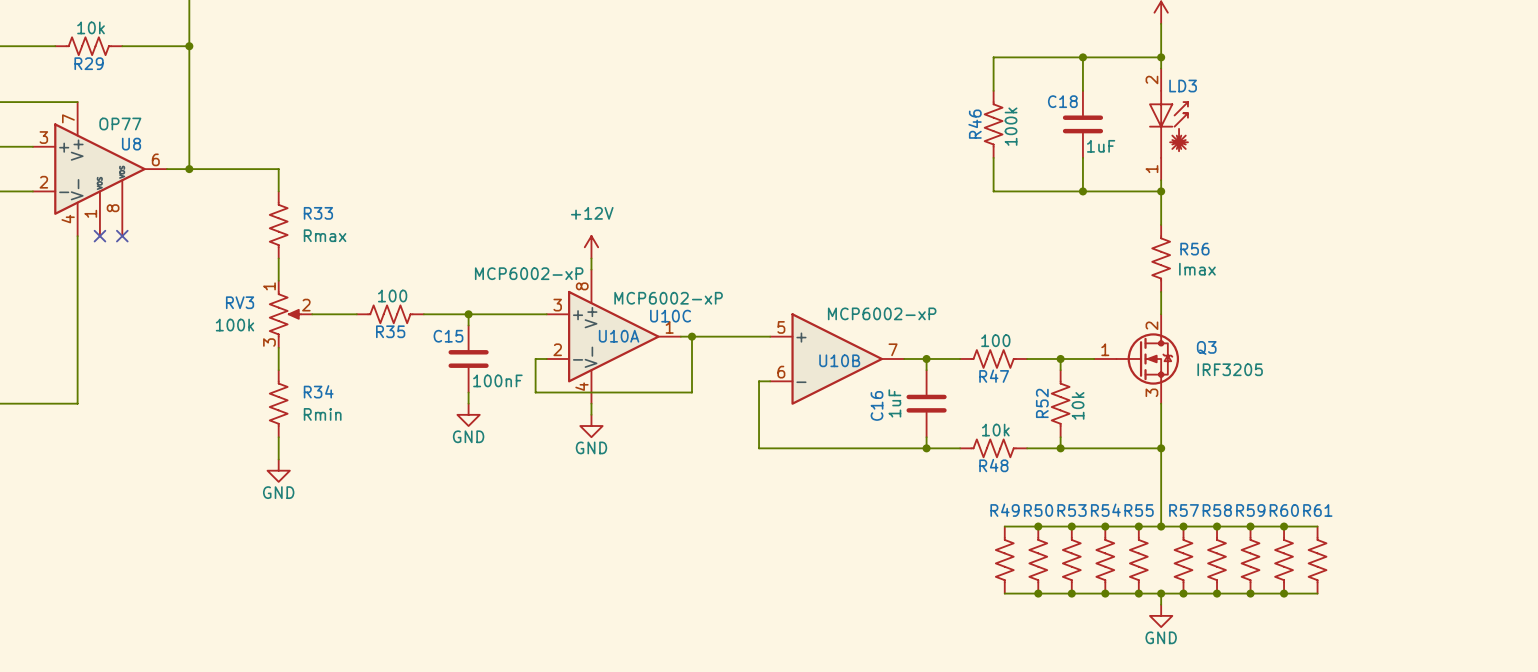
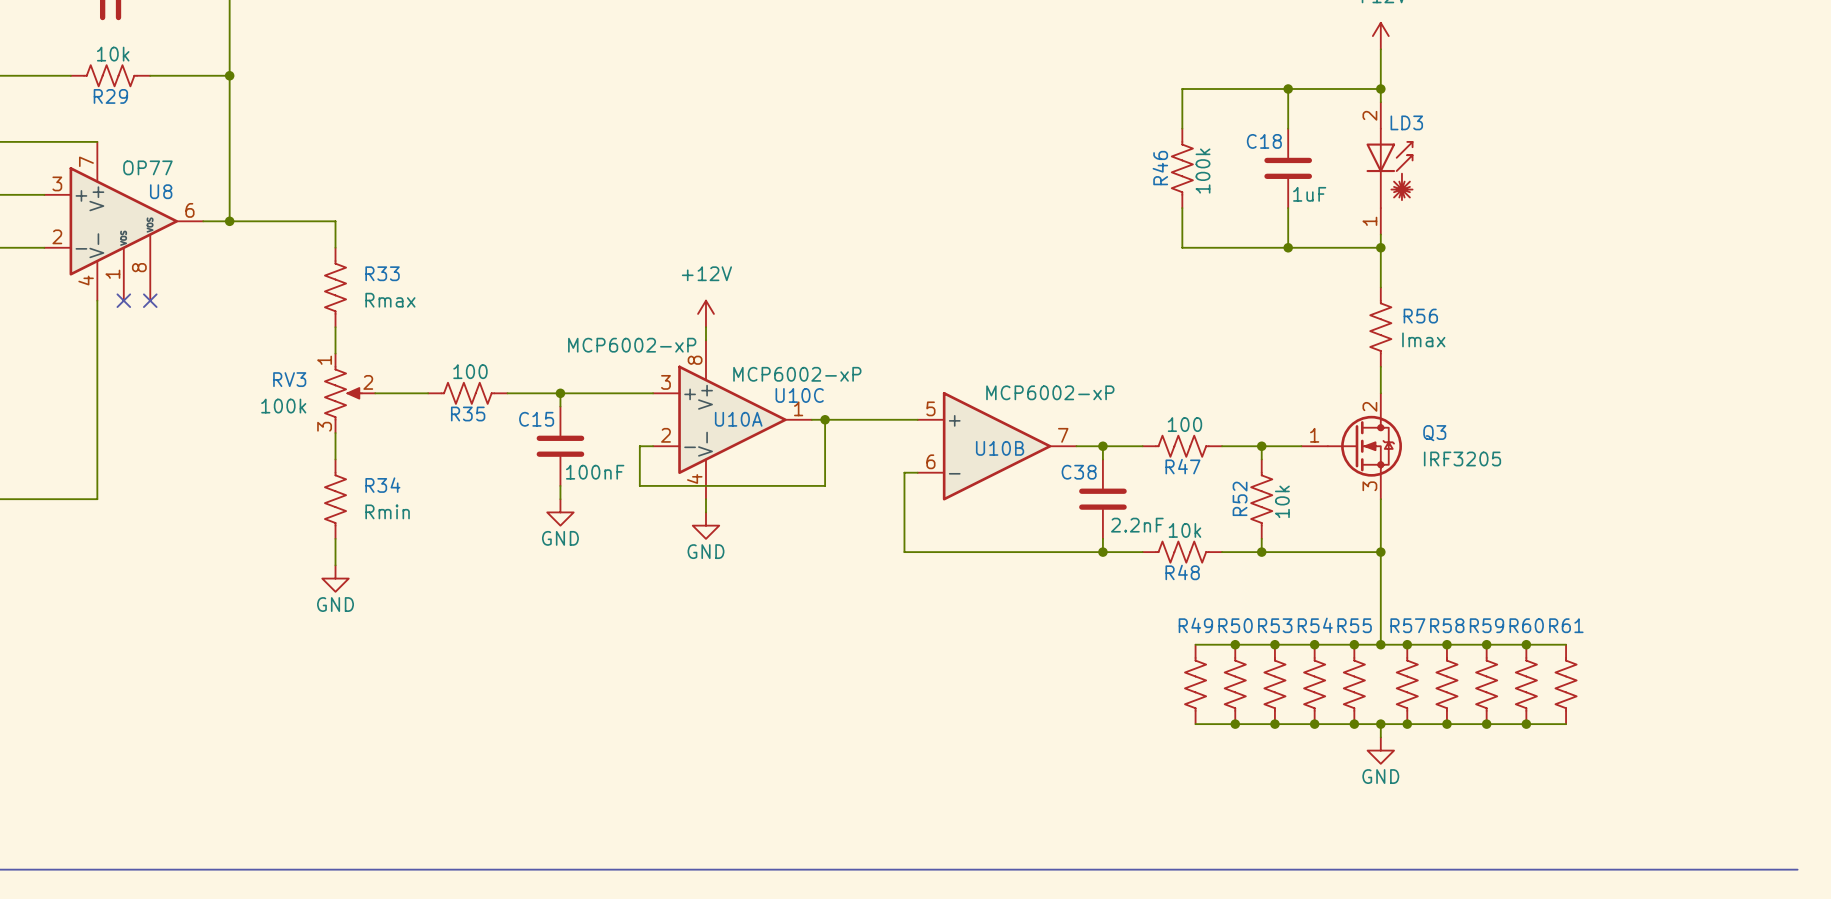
C16 value: 1uF (894, 403) -> 2.2nF (1137, 525)
C16 name: C16 (877, 405) -> C38 (1079, 472)

